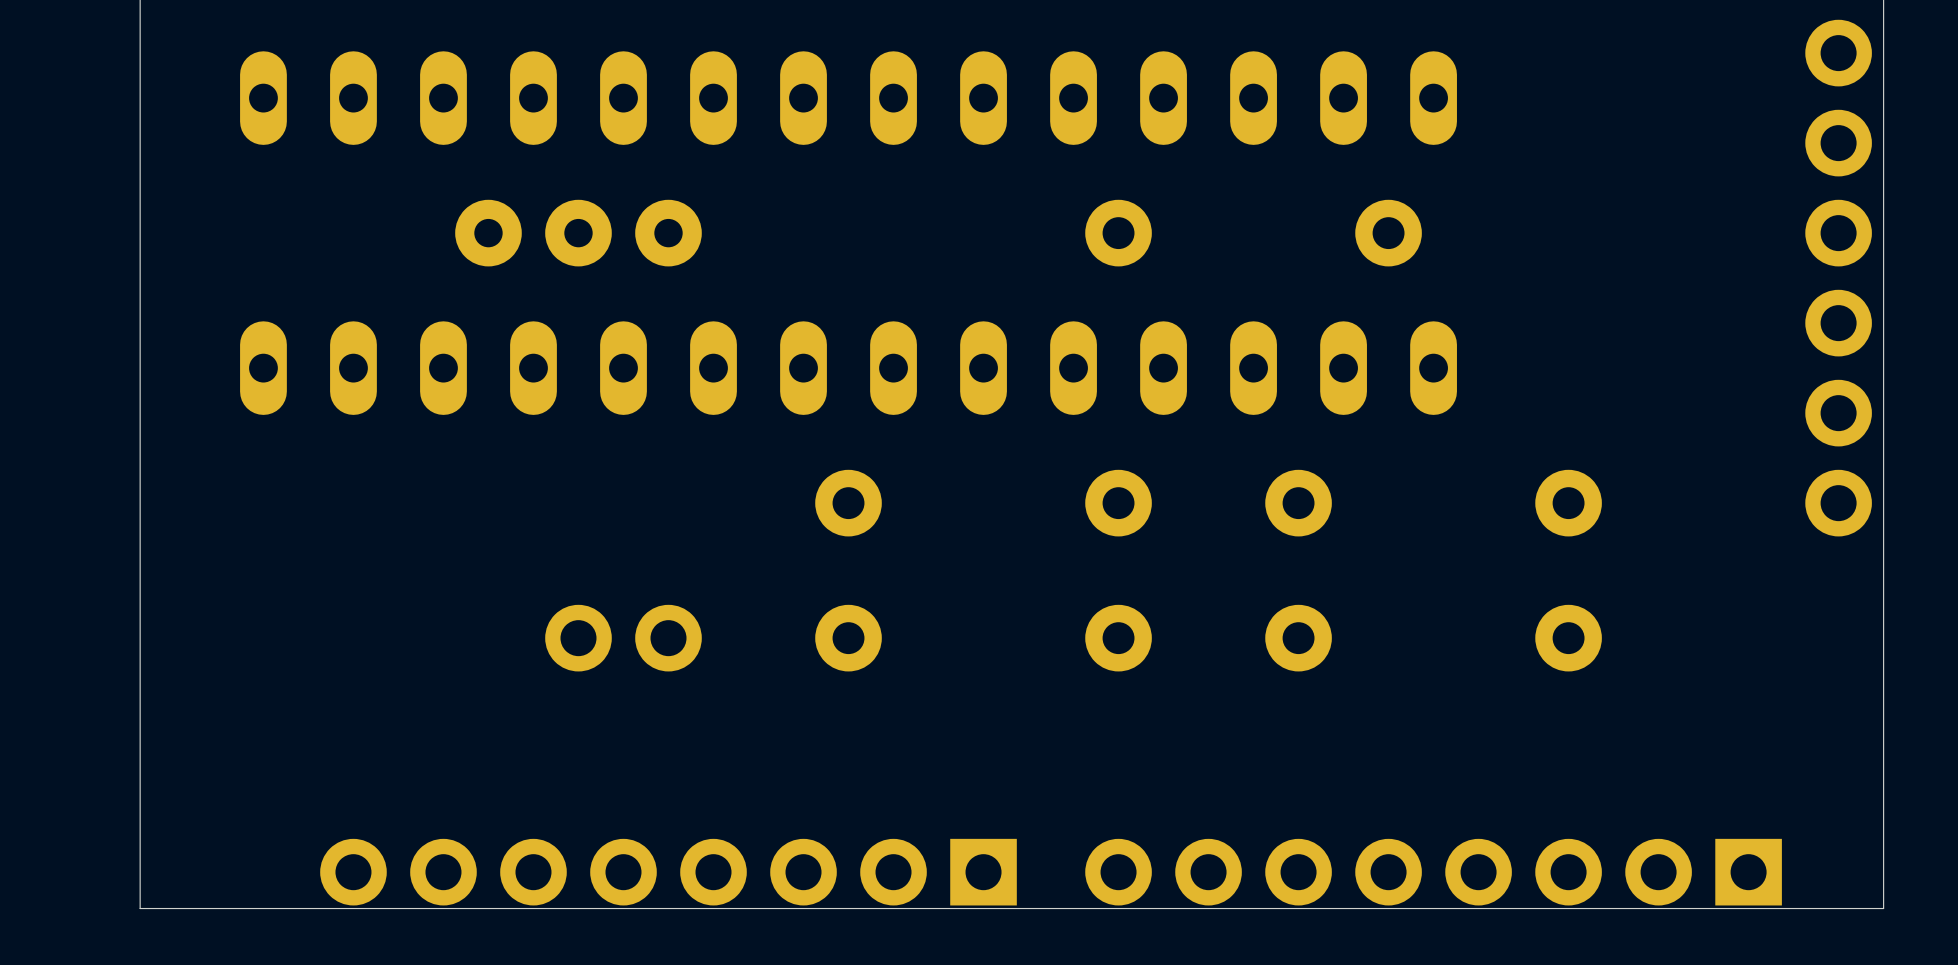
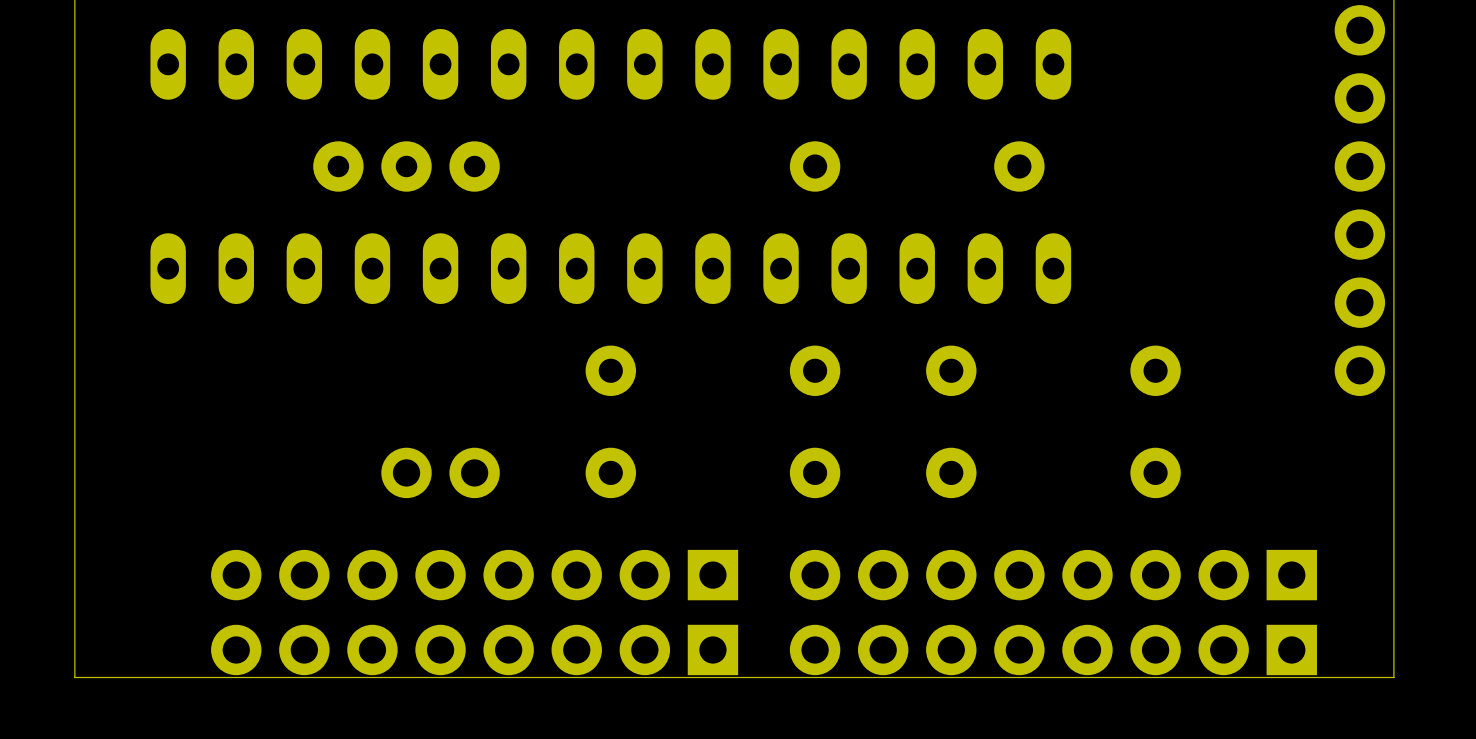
part: none -> (474, 575)
part: none -> (1053, 575)

